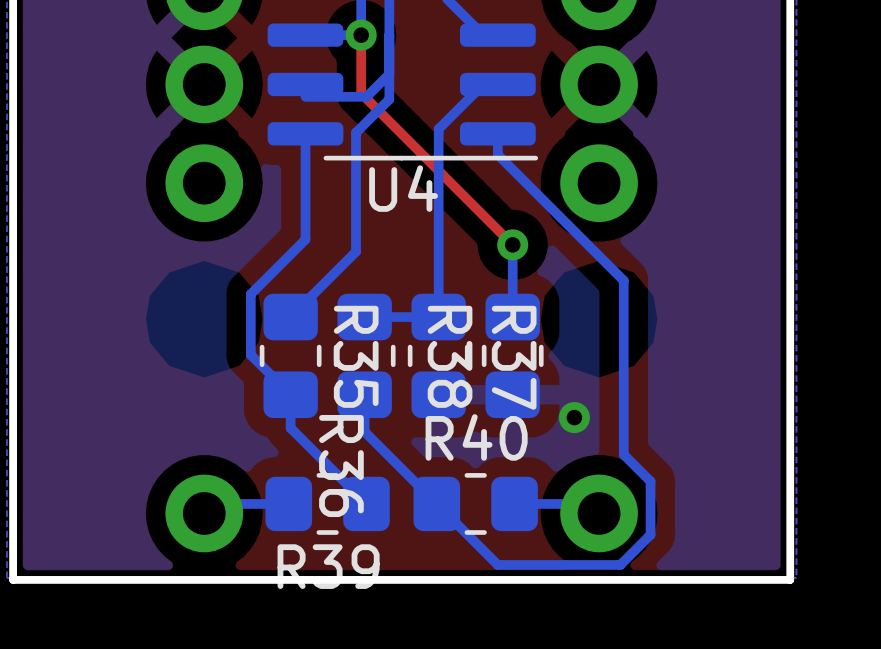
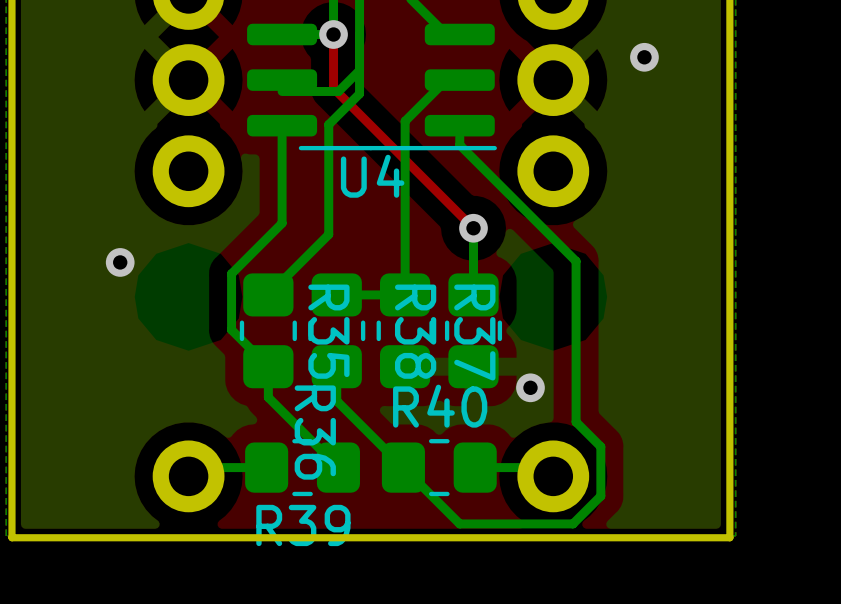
via: none -> (644, 57)
via: none -> (120, 262)

